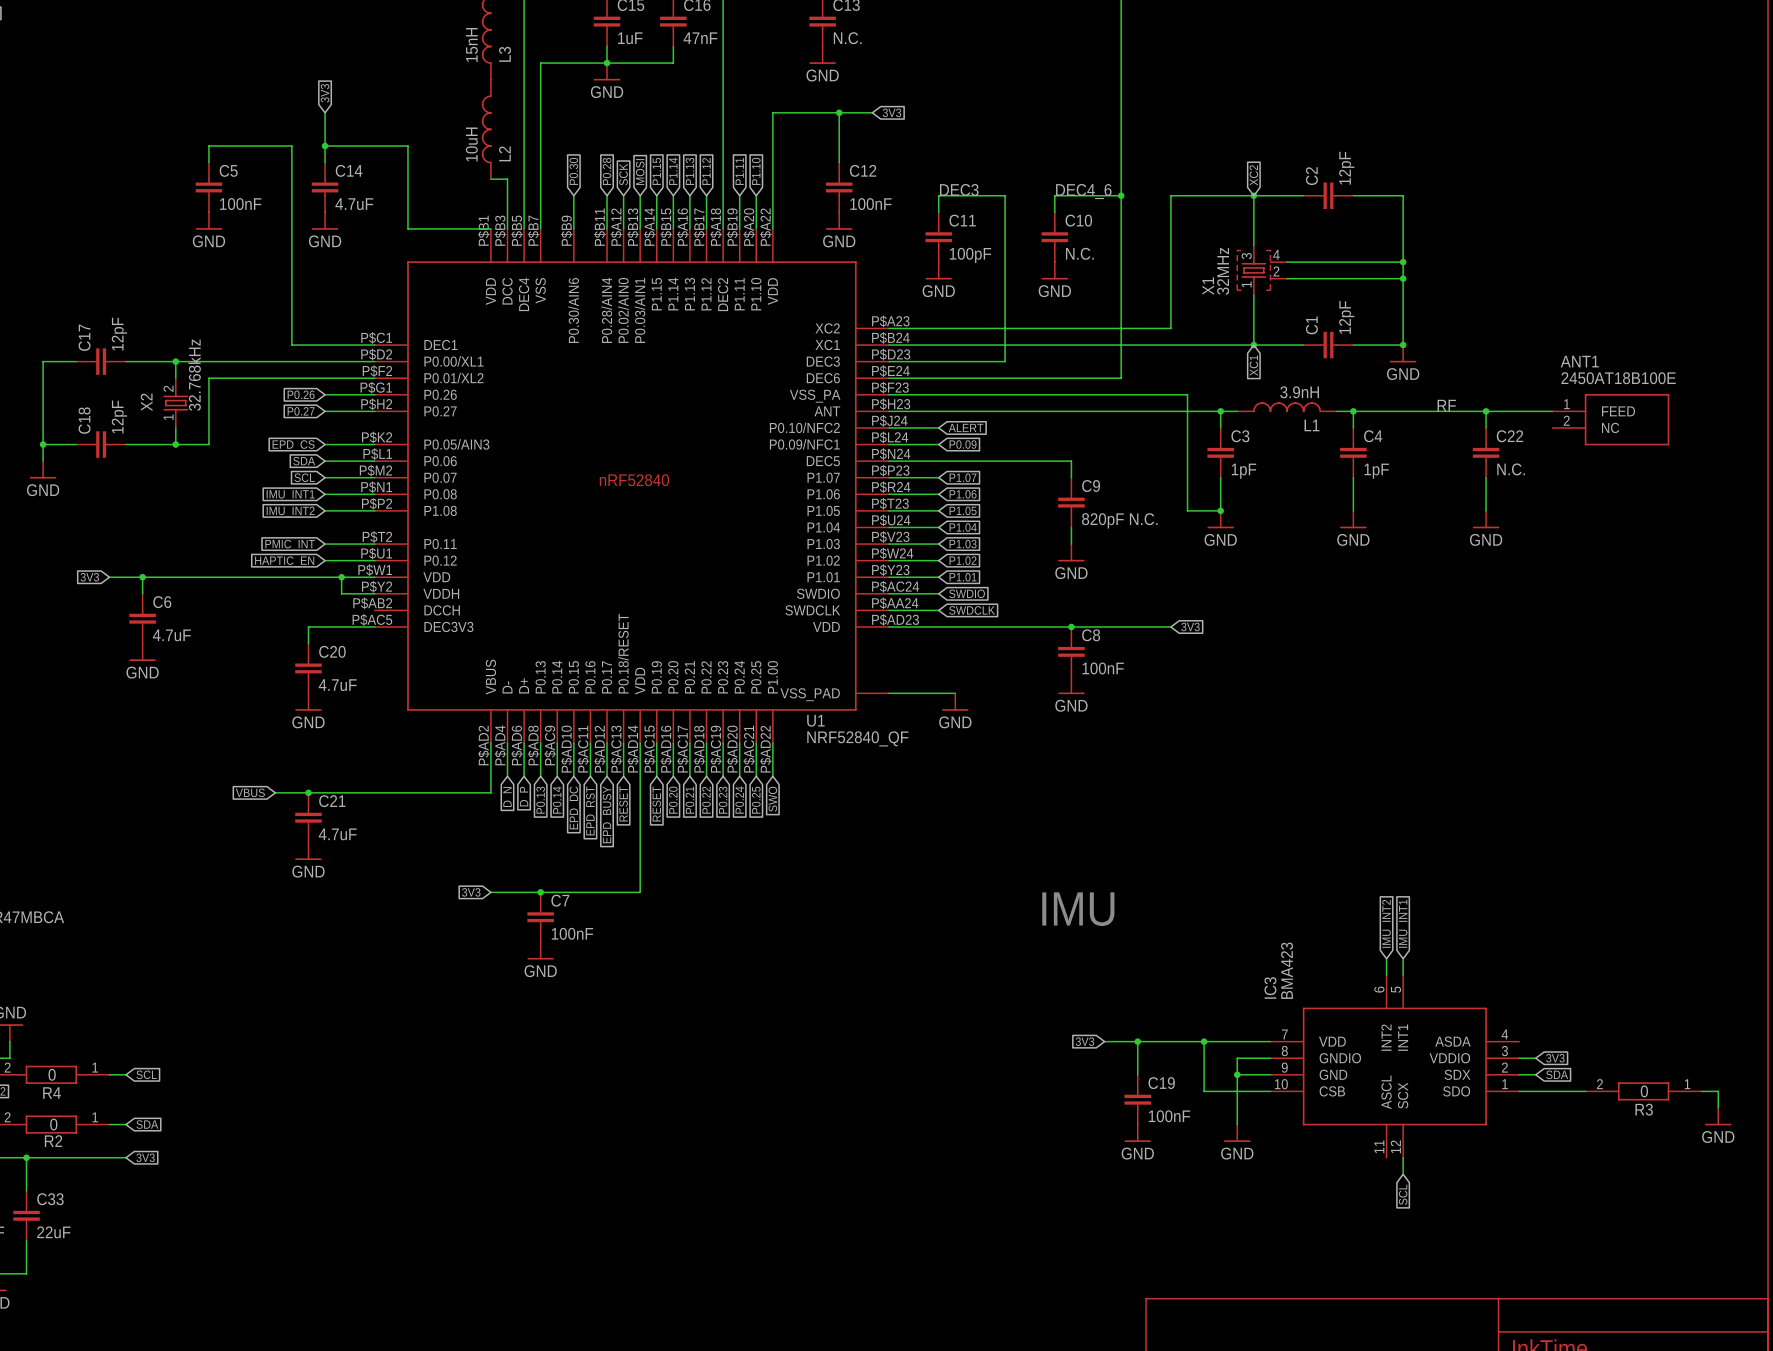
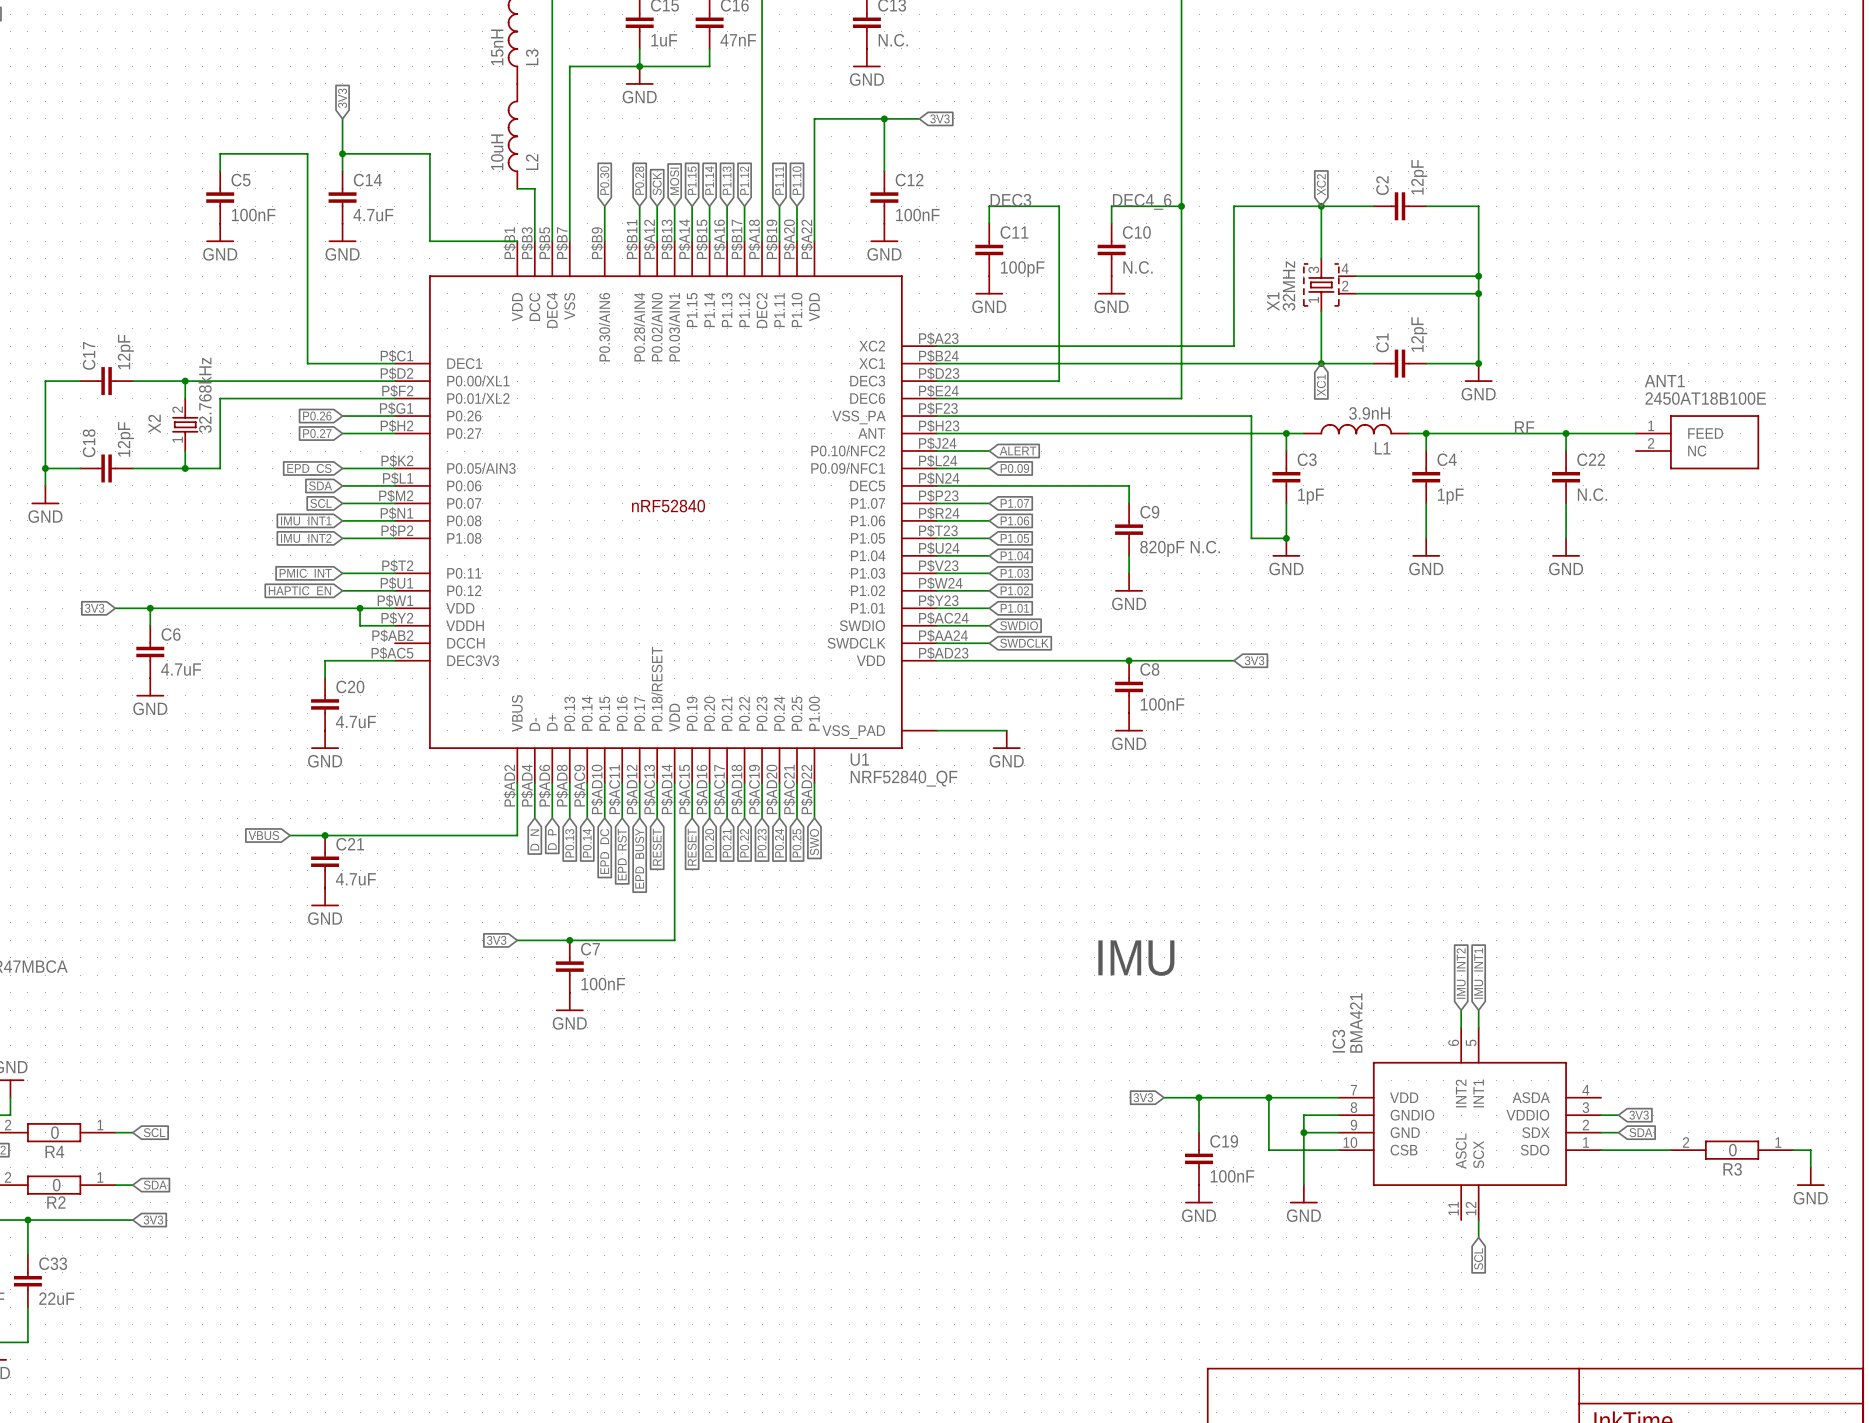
IC3 value: BMA423 (1287, 970) -> BMA421 (1356, 1023)

